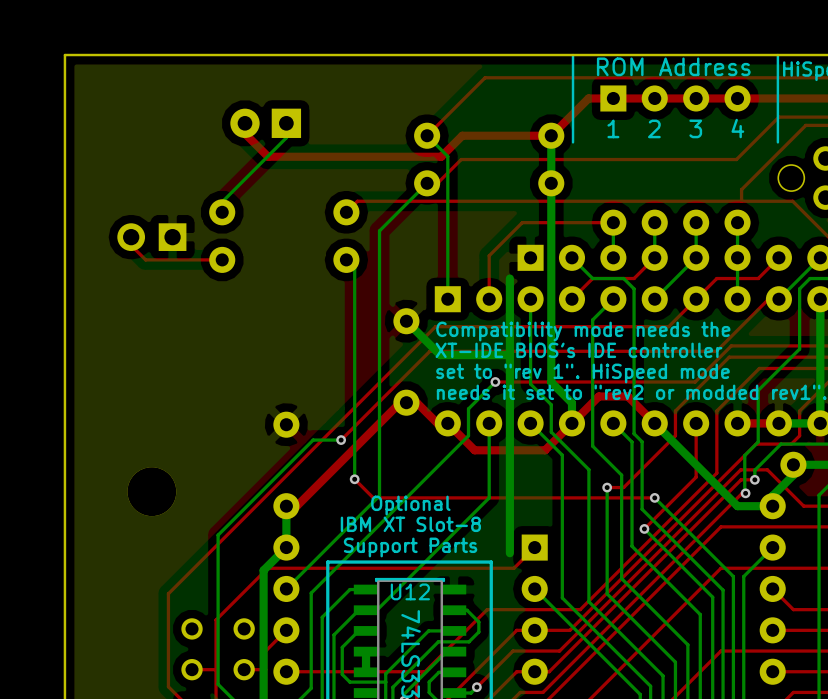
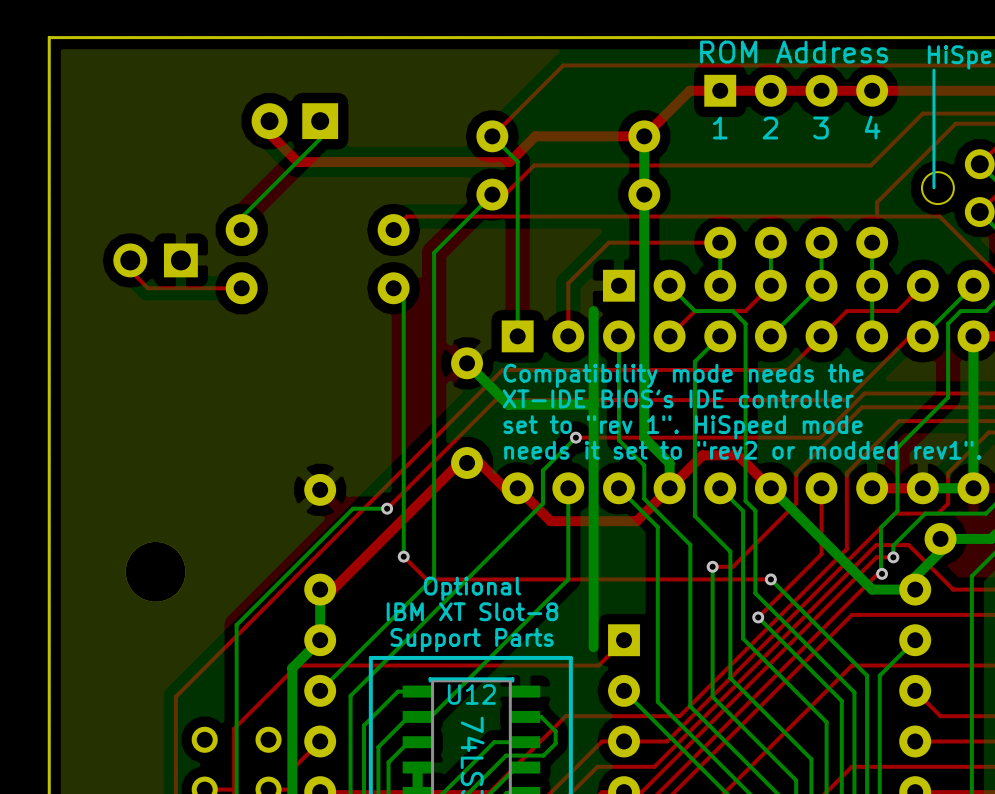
line: (573, 55) (573, 142) -> none
line: (777, 55) (777, 142) -> none
line: none -> (933, 70) (933, 187)

